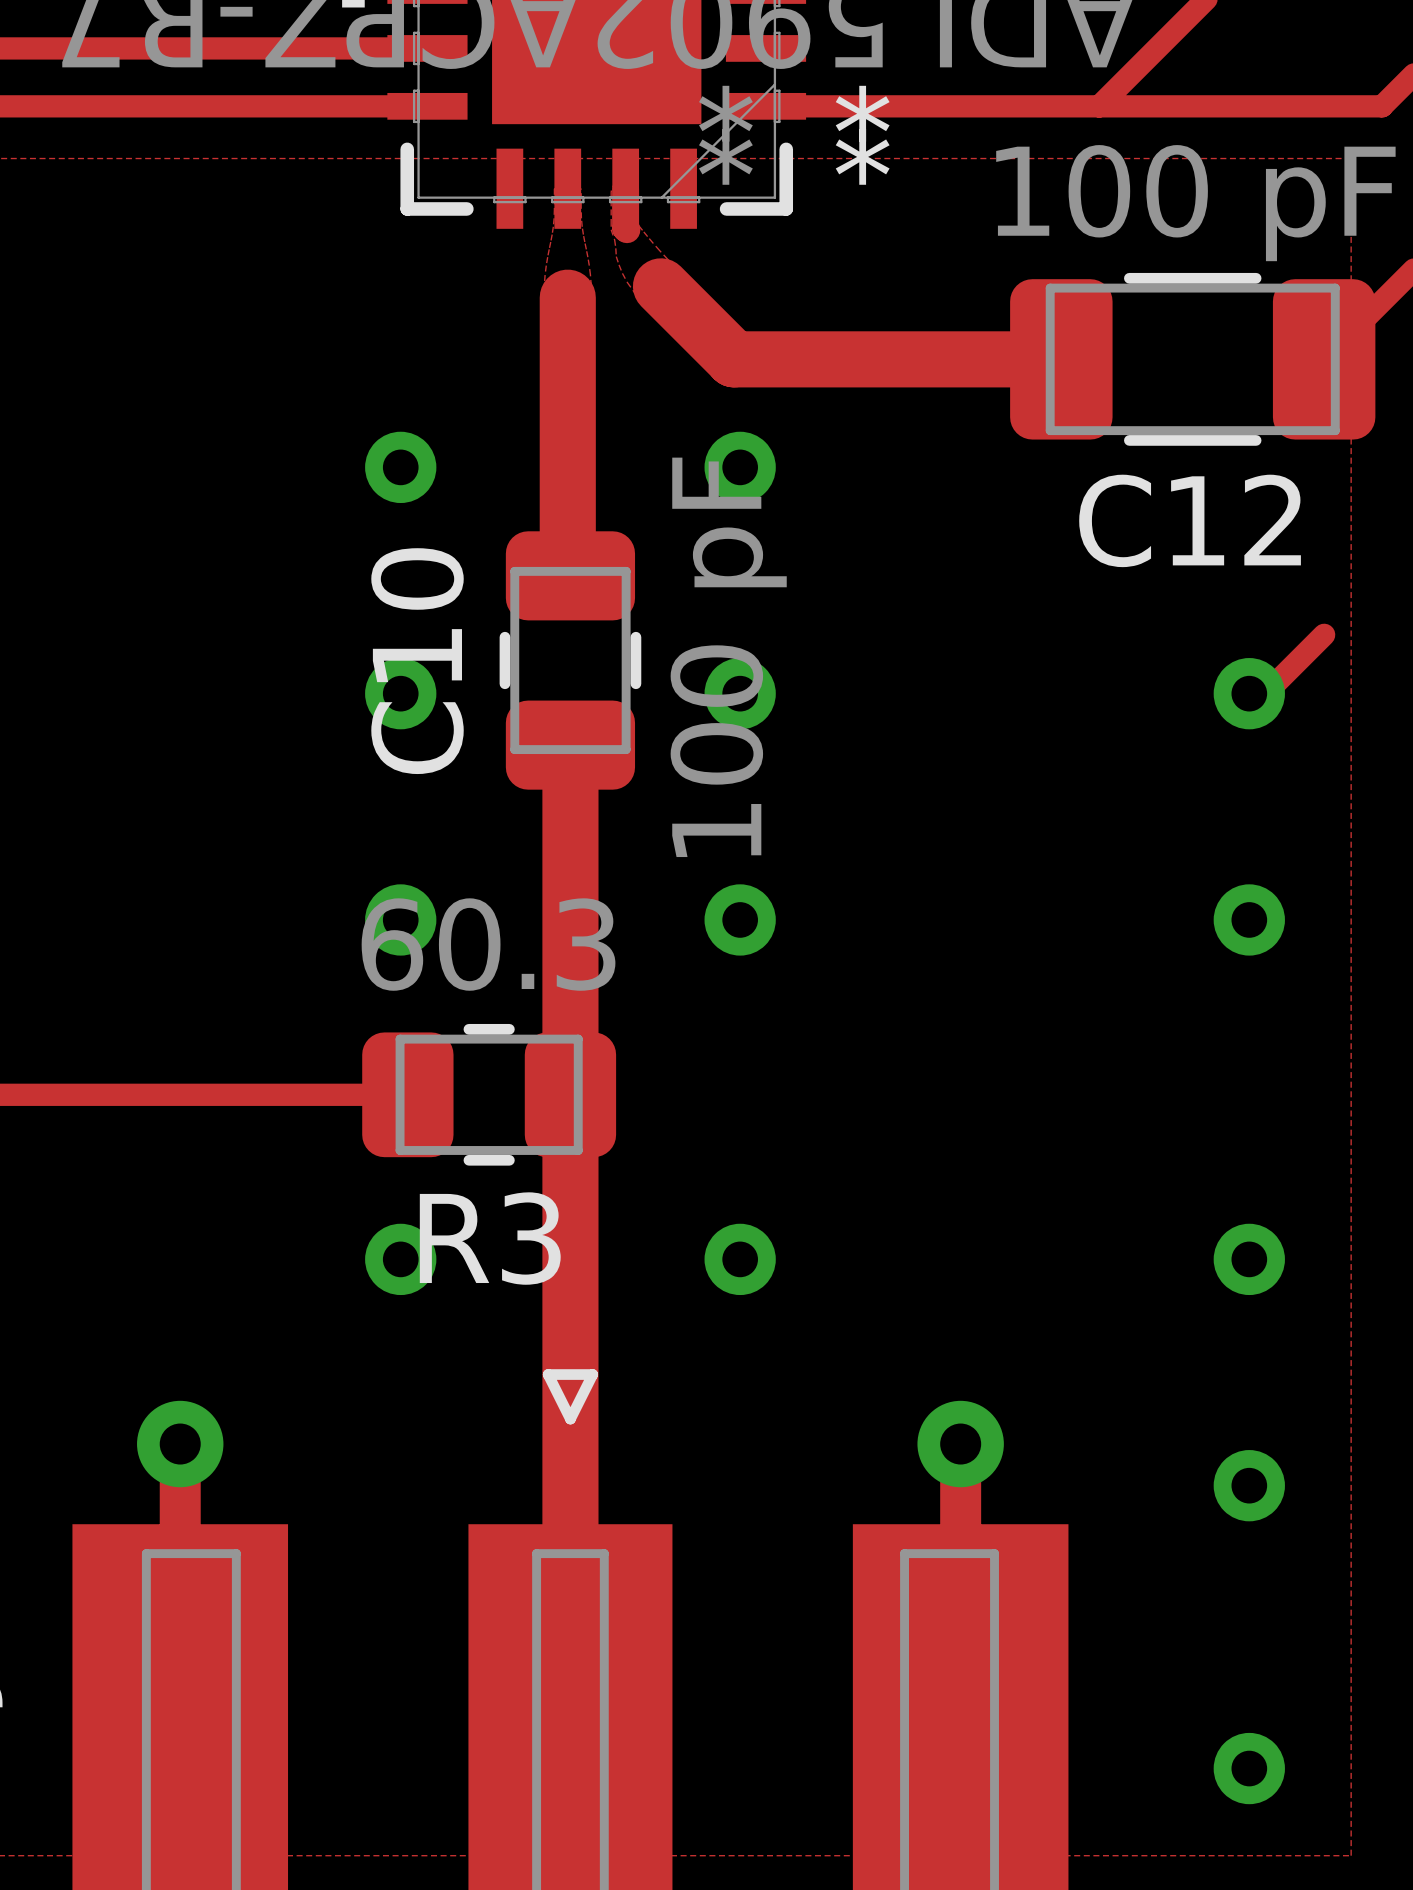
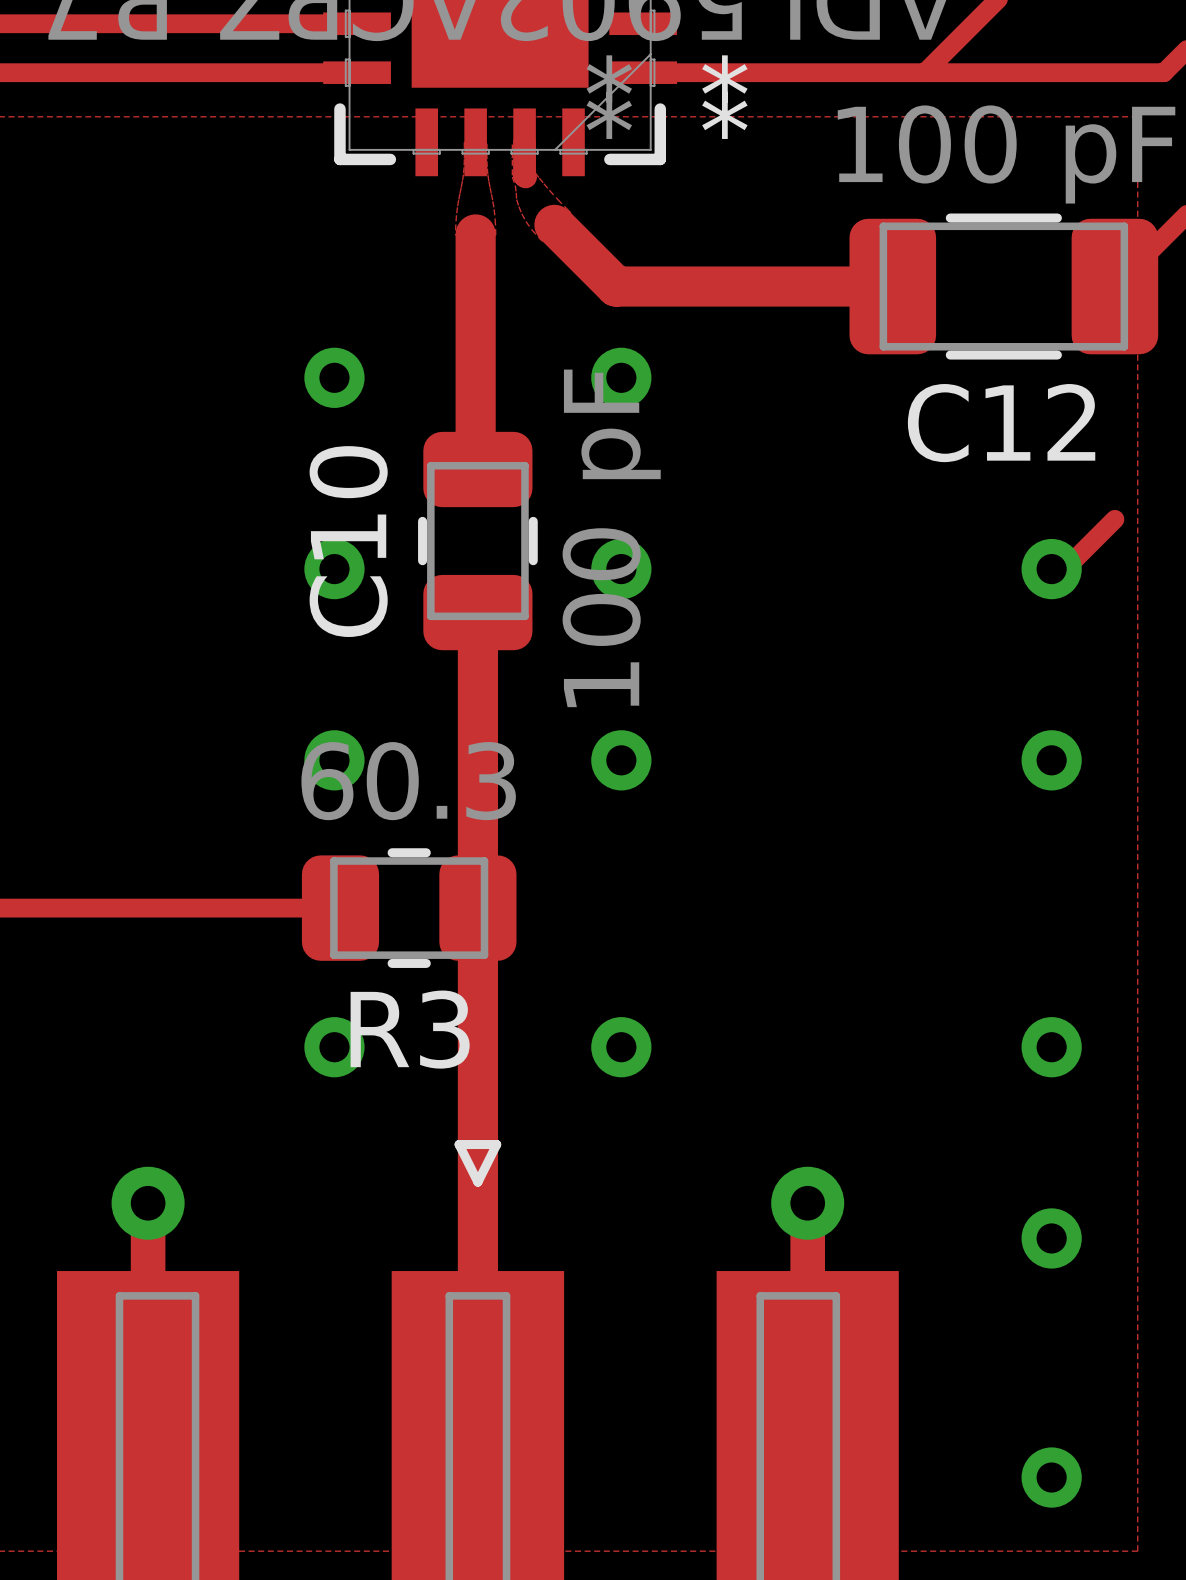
track width: thick (660, 286) (733, 359) (1061, 359) -> thin (554, 224) (616, 286) (892, 286)
track width: thick (567, 297) (567, 573) (570, 575) -> thin (475, 234) (475, 467) (477, 469)
track width: thick (570, 745) (570, 1750) -> thin (477, 612) (477, 1462)

